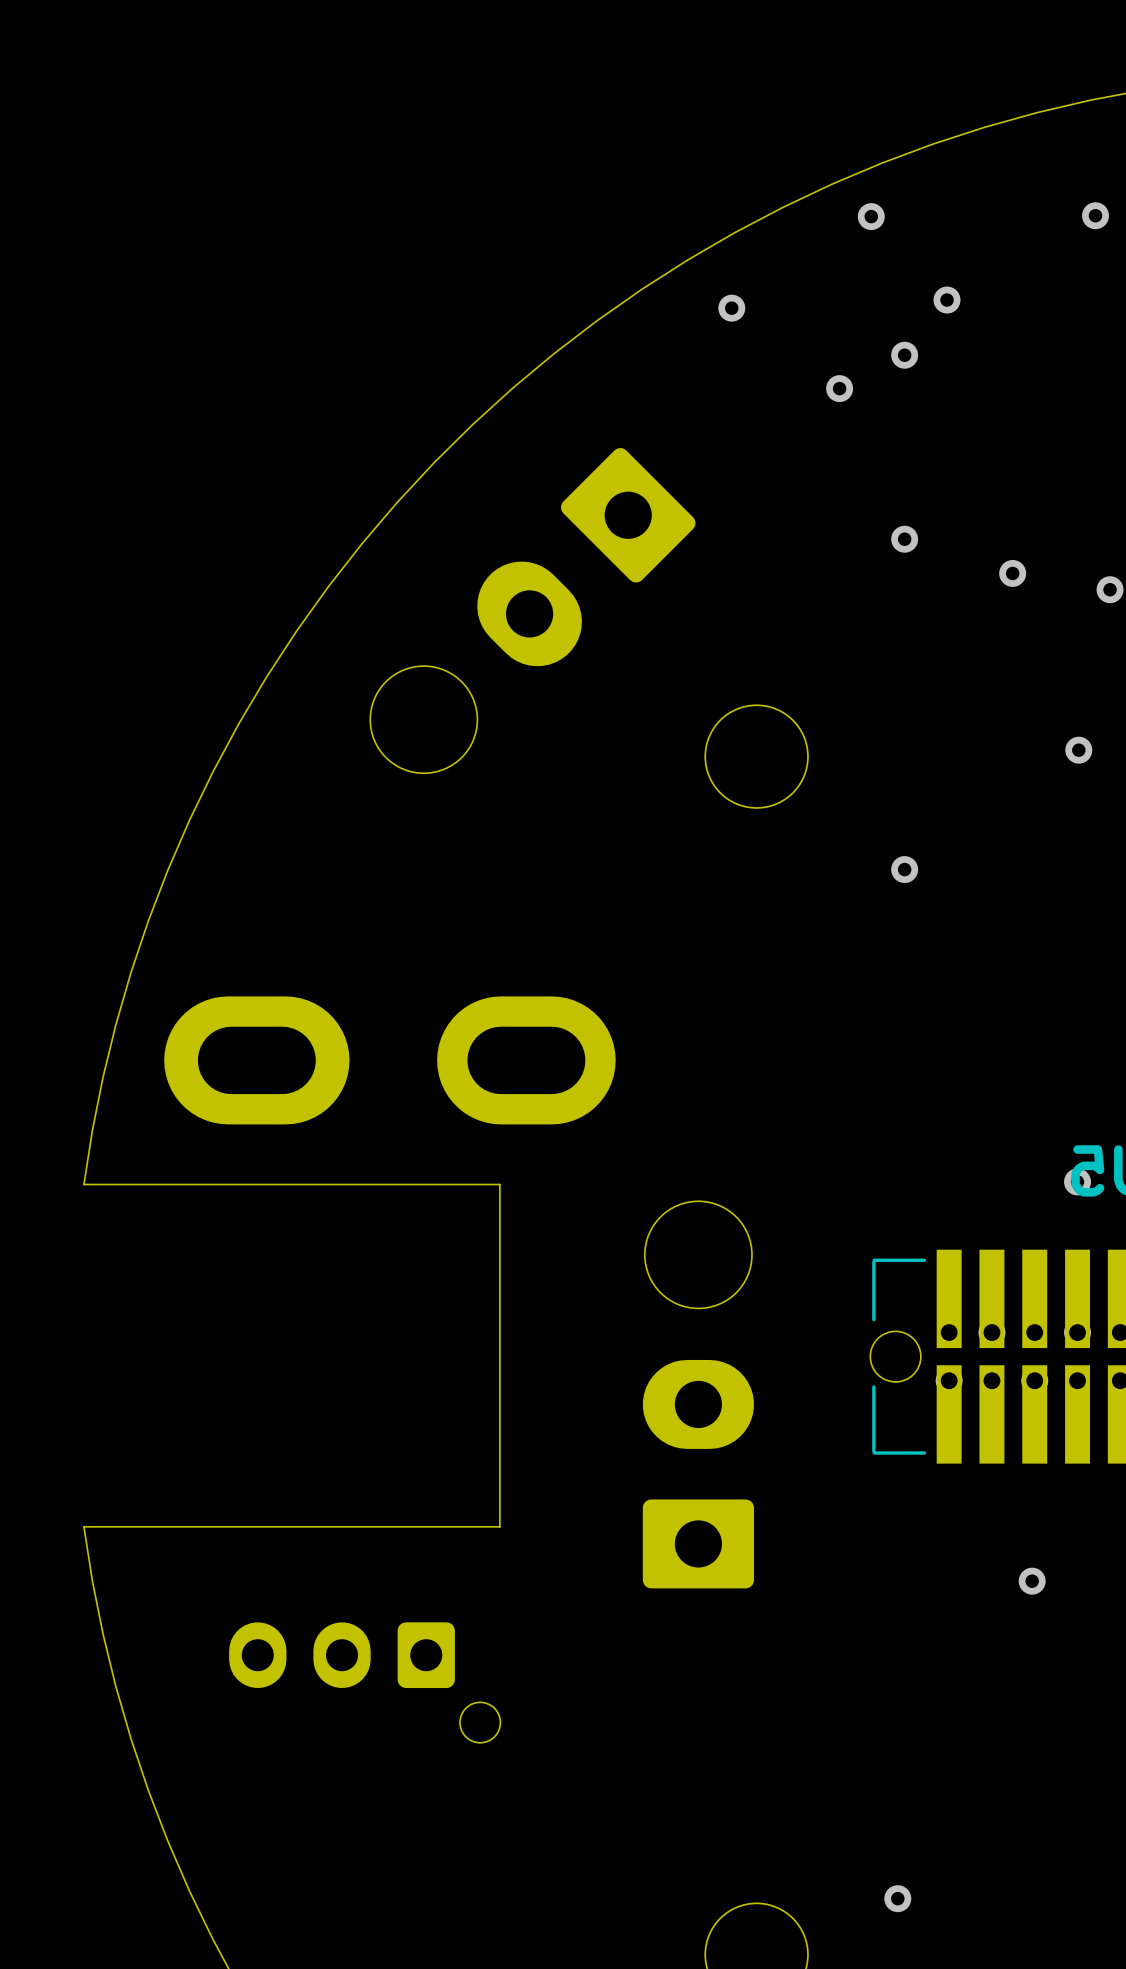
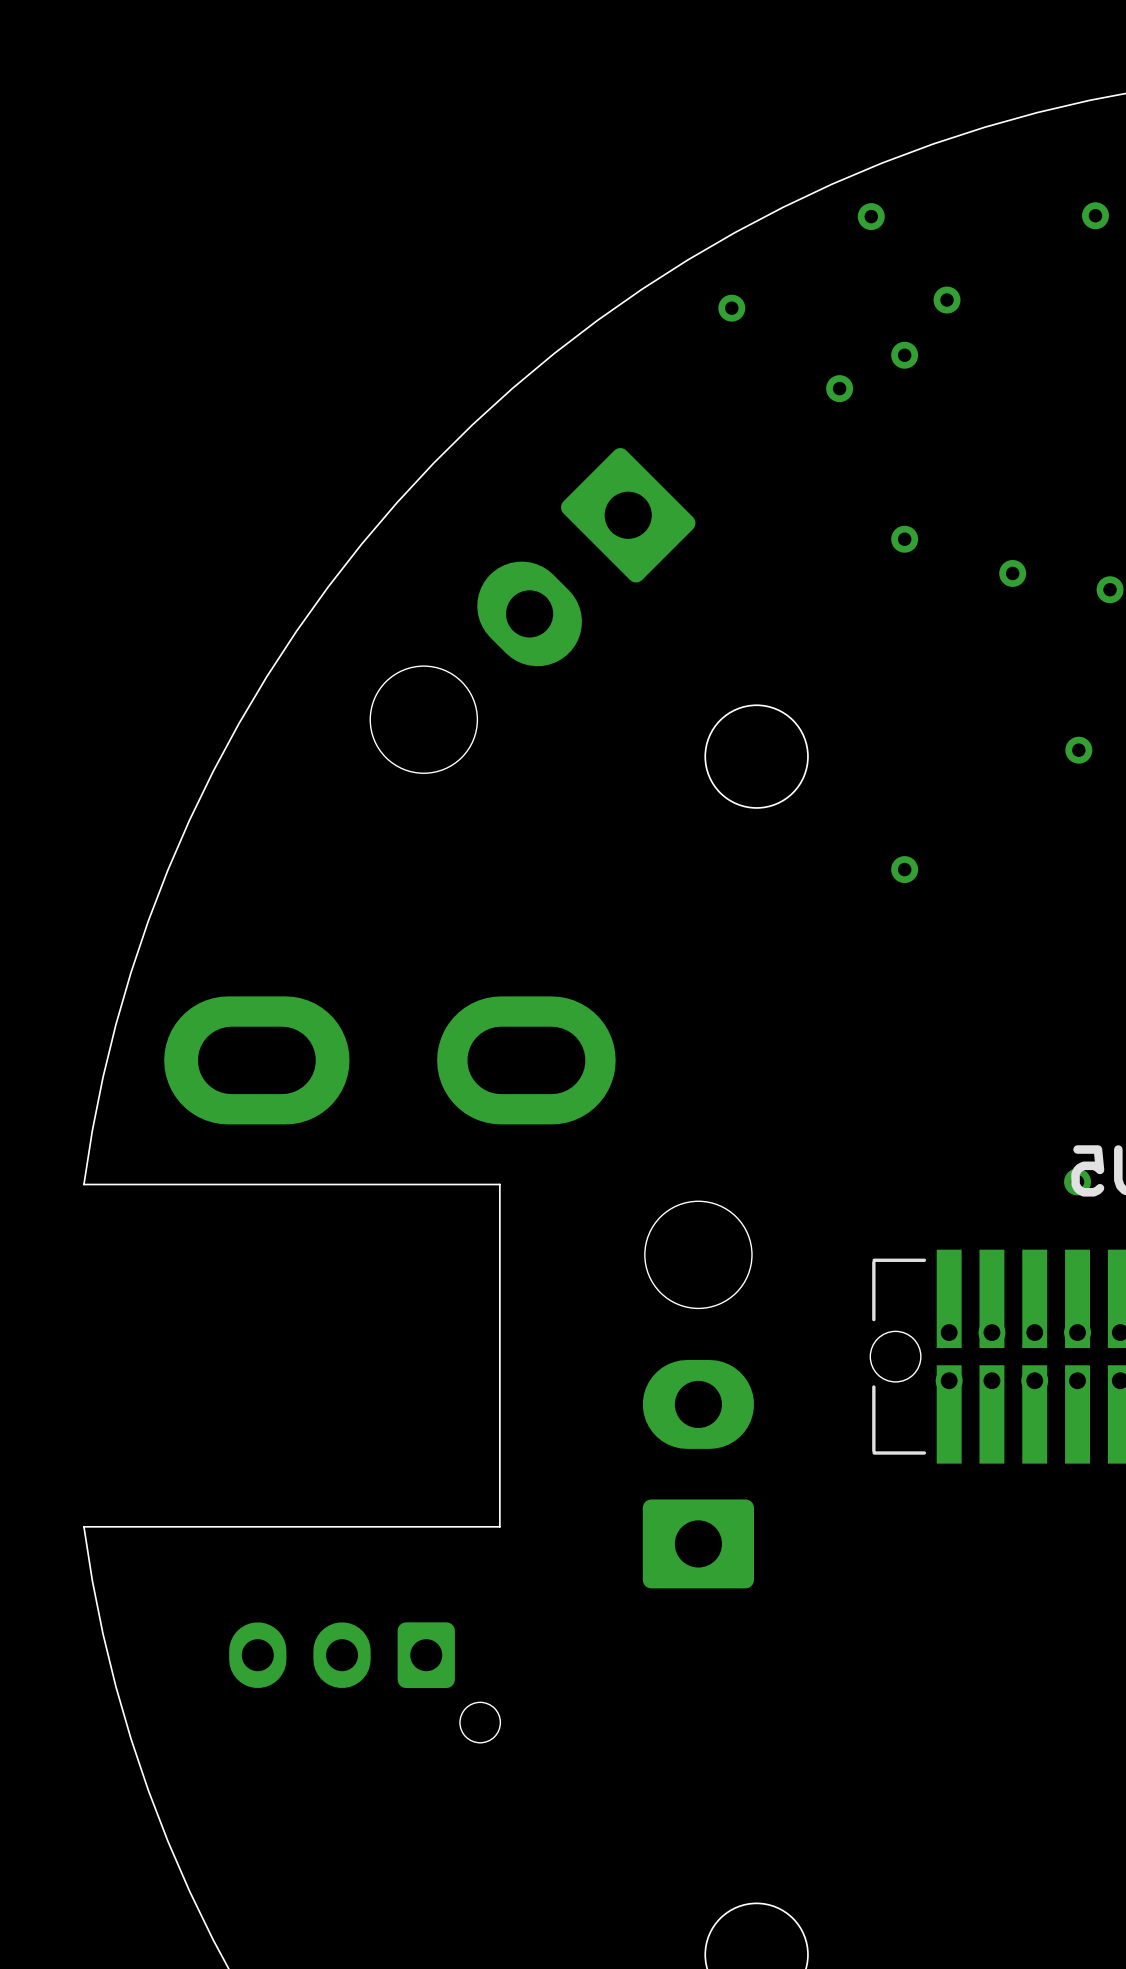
via: (1032, 1581) -> none
via: (897, 1898) -> none

